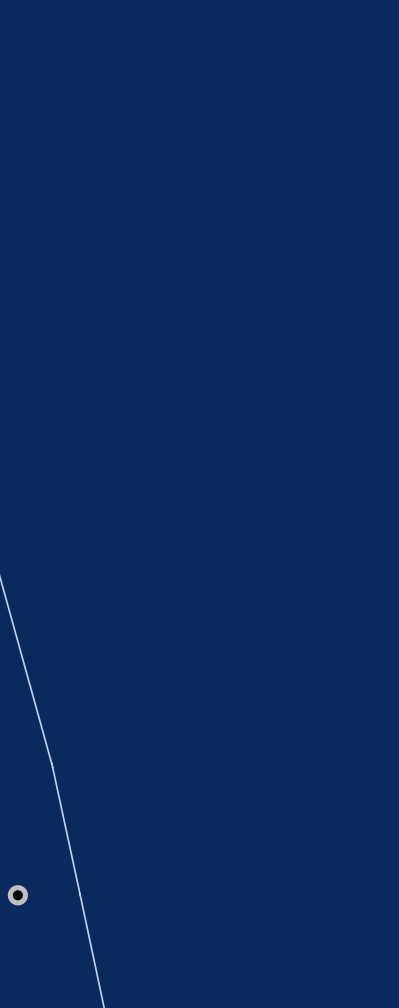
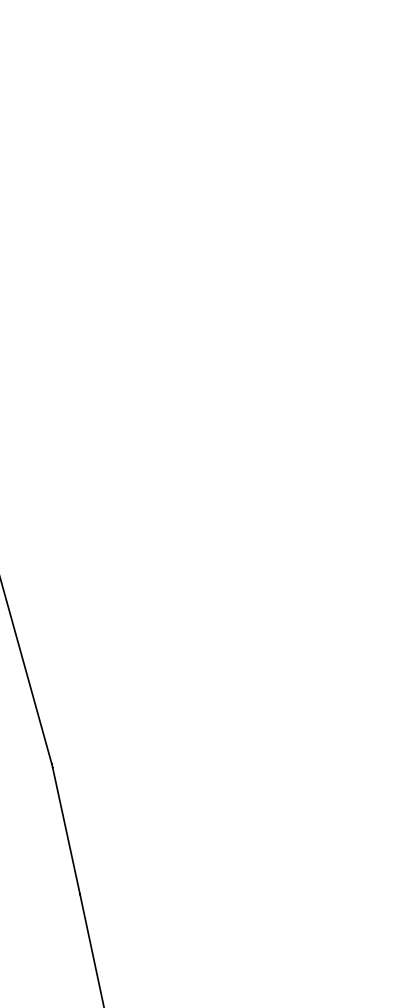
via: (17, 895) -> none

